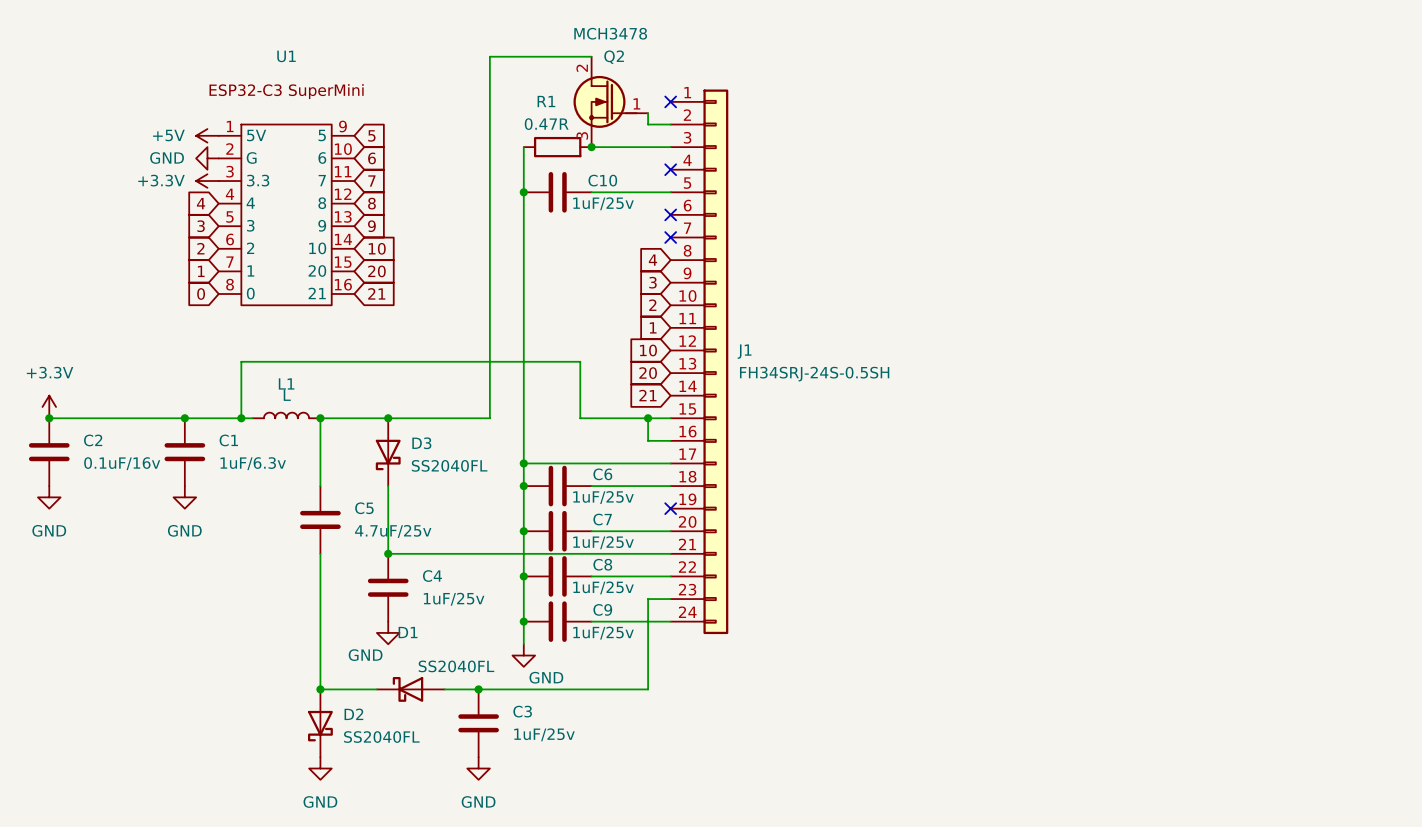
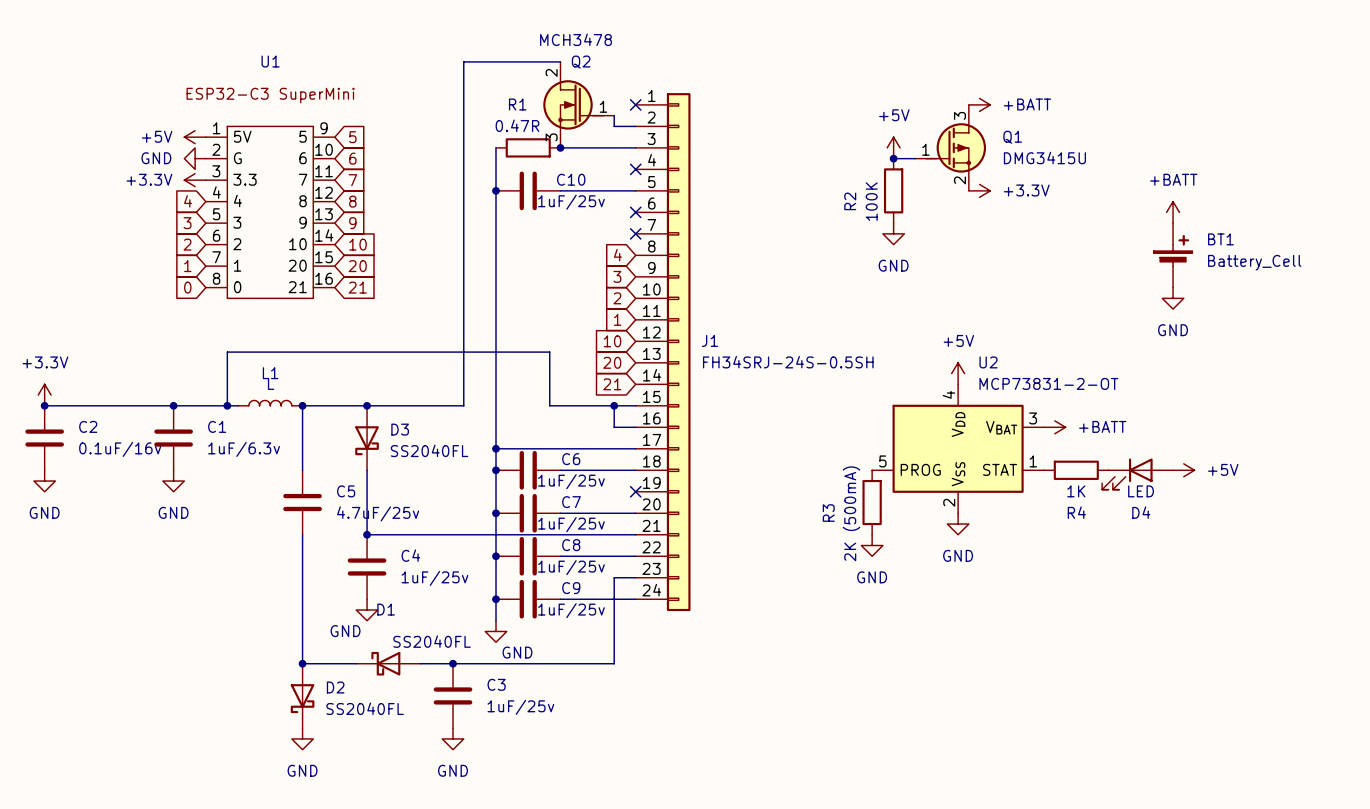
power symbol: none -> +BATT (979, 104)
power symbol: none -> +5V (893, 147)
Q1: none -> DMG3415U (950, 147)
wire: none -> (893, 158) (915, 158)
junction: none -> (893, 158)
R2: none -> 100K (893, 190)
power symbol: none -> +3.3V (979, 190)
power symbol: none -> +BATT (1173, 212)
power symbol: none -> GND (893, 233)
BT1: none -> Battery_Cell (1173, 255)
power symbol: none -> GND (1173, 298)
power symbol: none -> +5V (958, 373)
power symbol: none -> +BATT (1054, 427)
U2: none -> MCP73831-2-OT (958, 448)
R4: none -> 1K (1076, 470)
power symbol: none -> +5V (1183, 470)
D4: none -> LED (1137, 474)
R3: none -> 2K (500mA) (872, 502)
power symbol: none -> GND (958, 524)
power symbol: none -> GND (872, 545)

